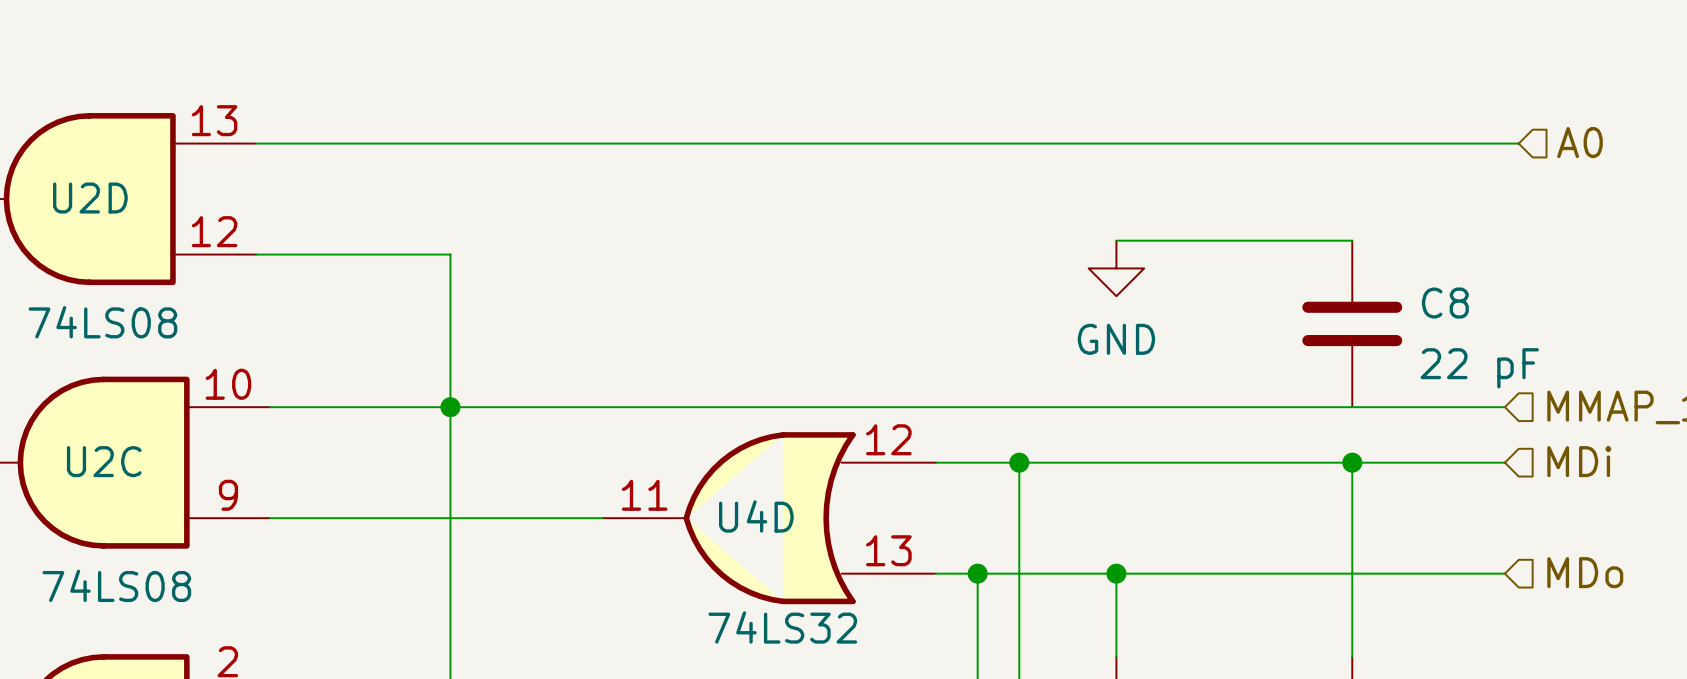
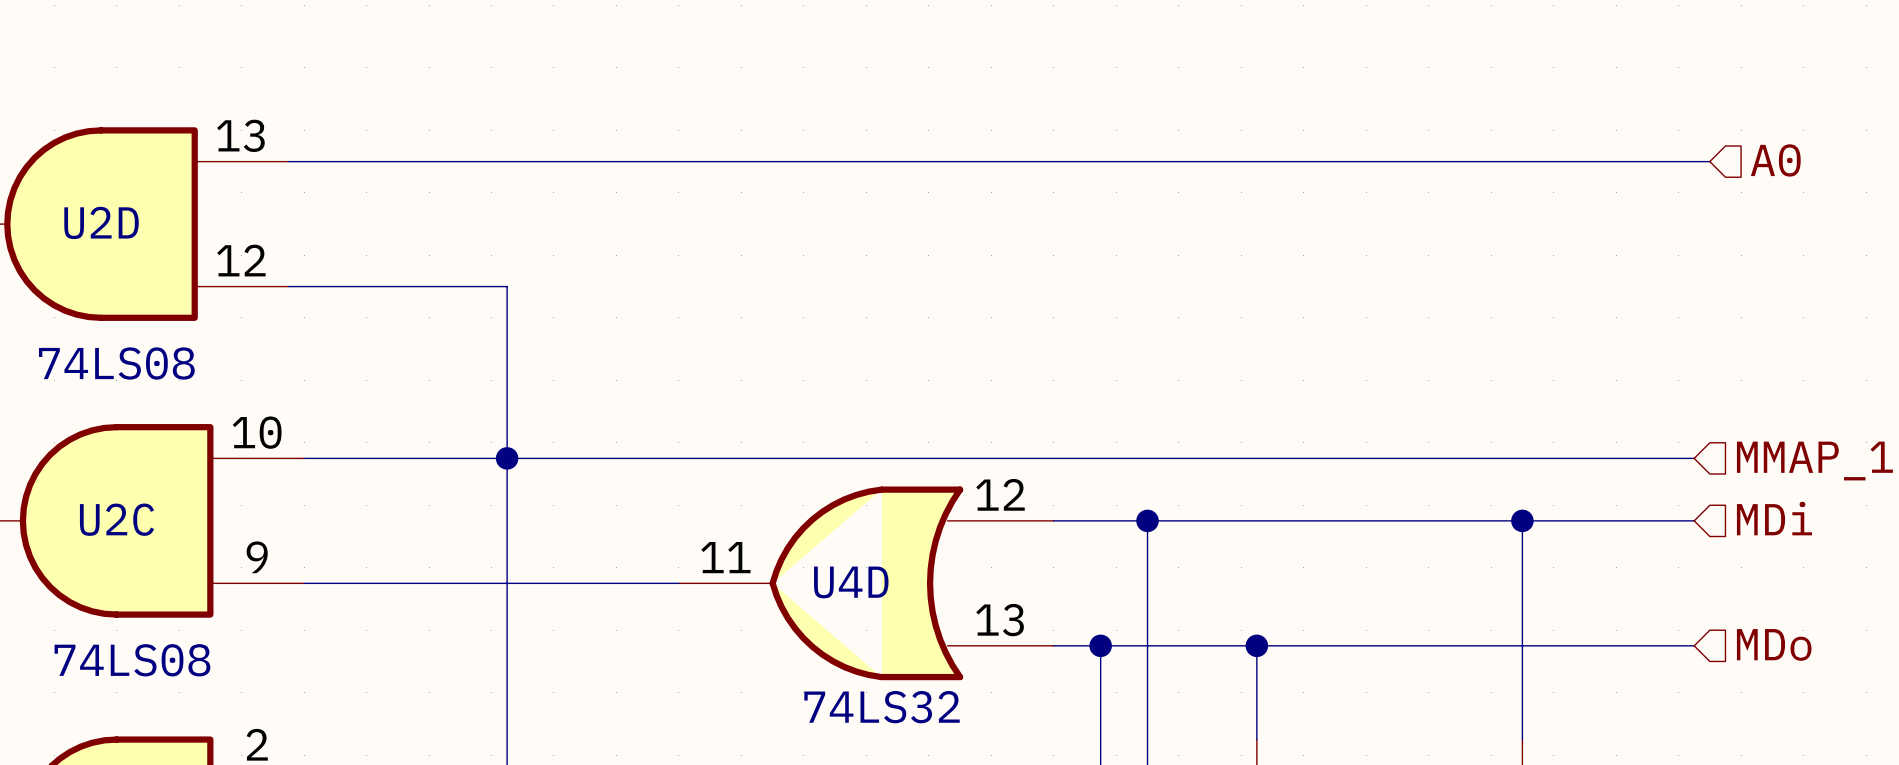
wire: (1116, 240) (1352, 240) -> none
power symbol: GND (1116, 268) -> none
C8: 22 pF (1352, 323) -> none

